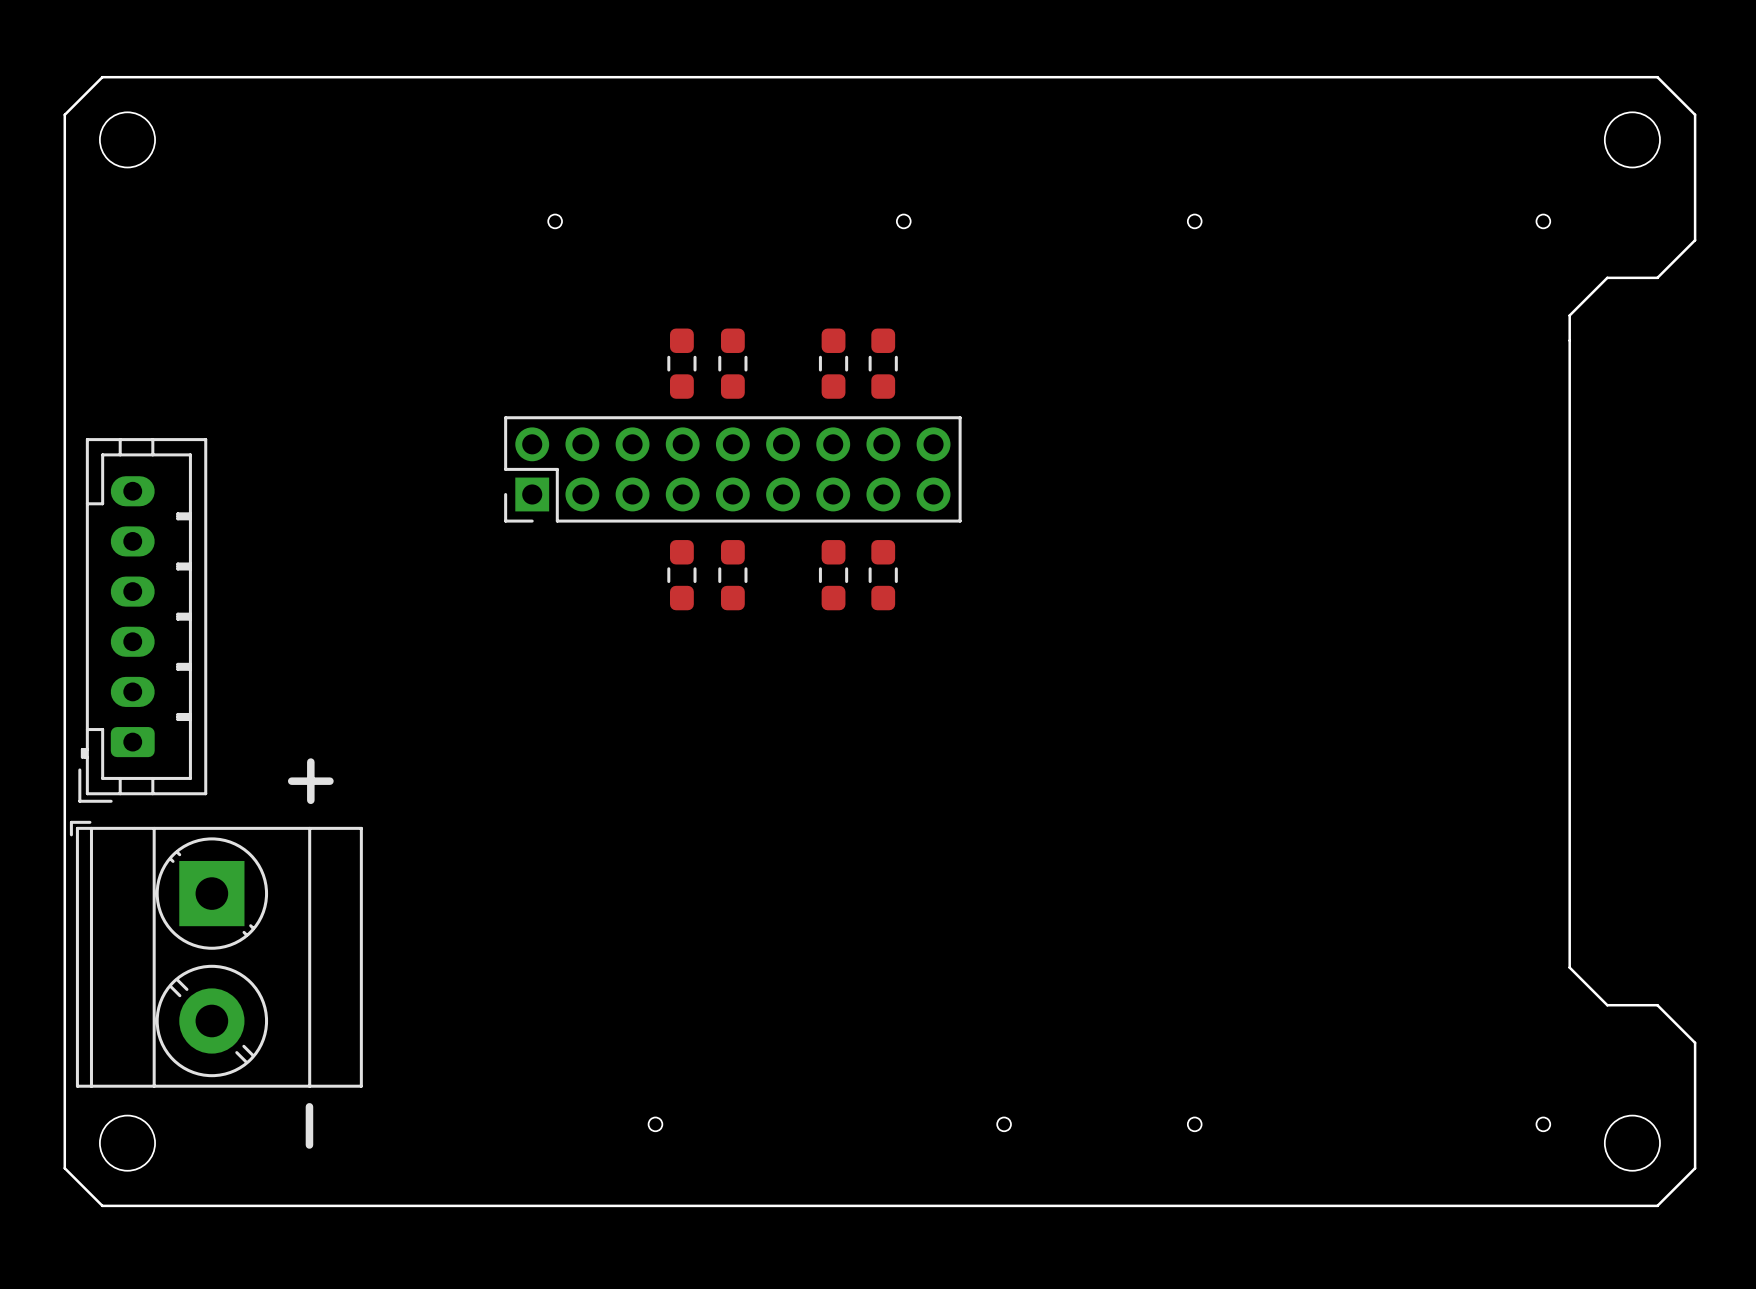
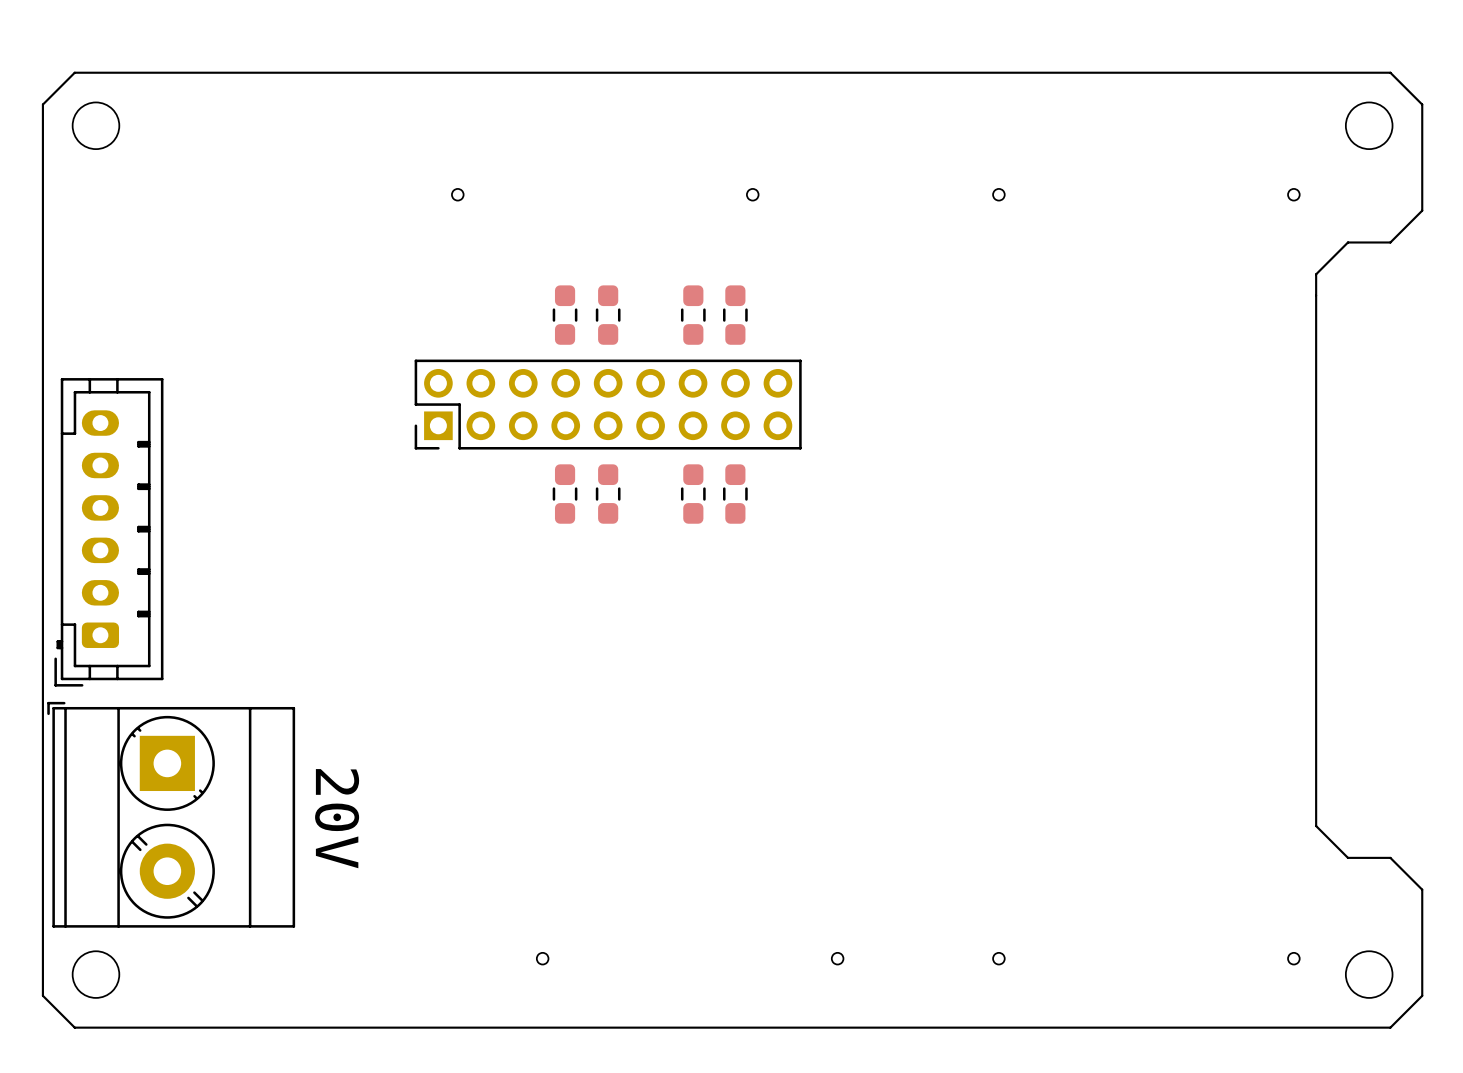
text: + (310, 781) -> none
part text: none -> 20V (337, 818)
text: - (309, 1125) -> none

